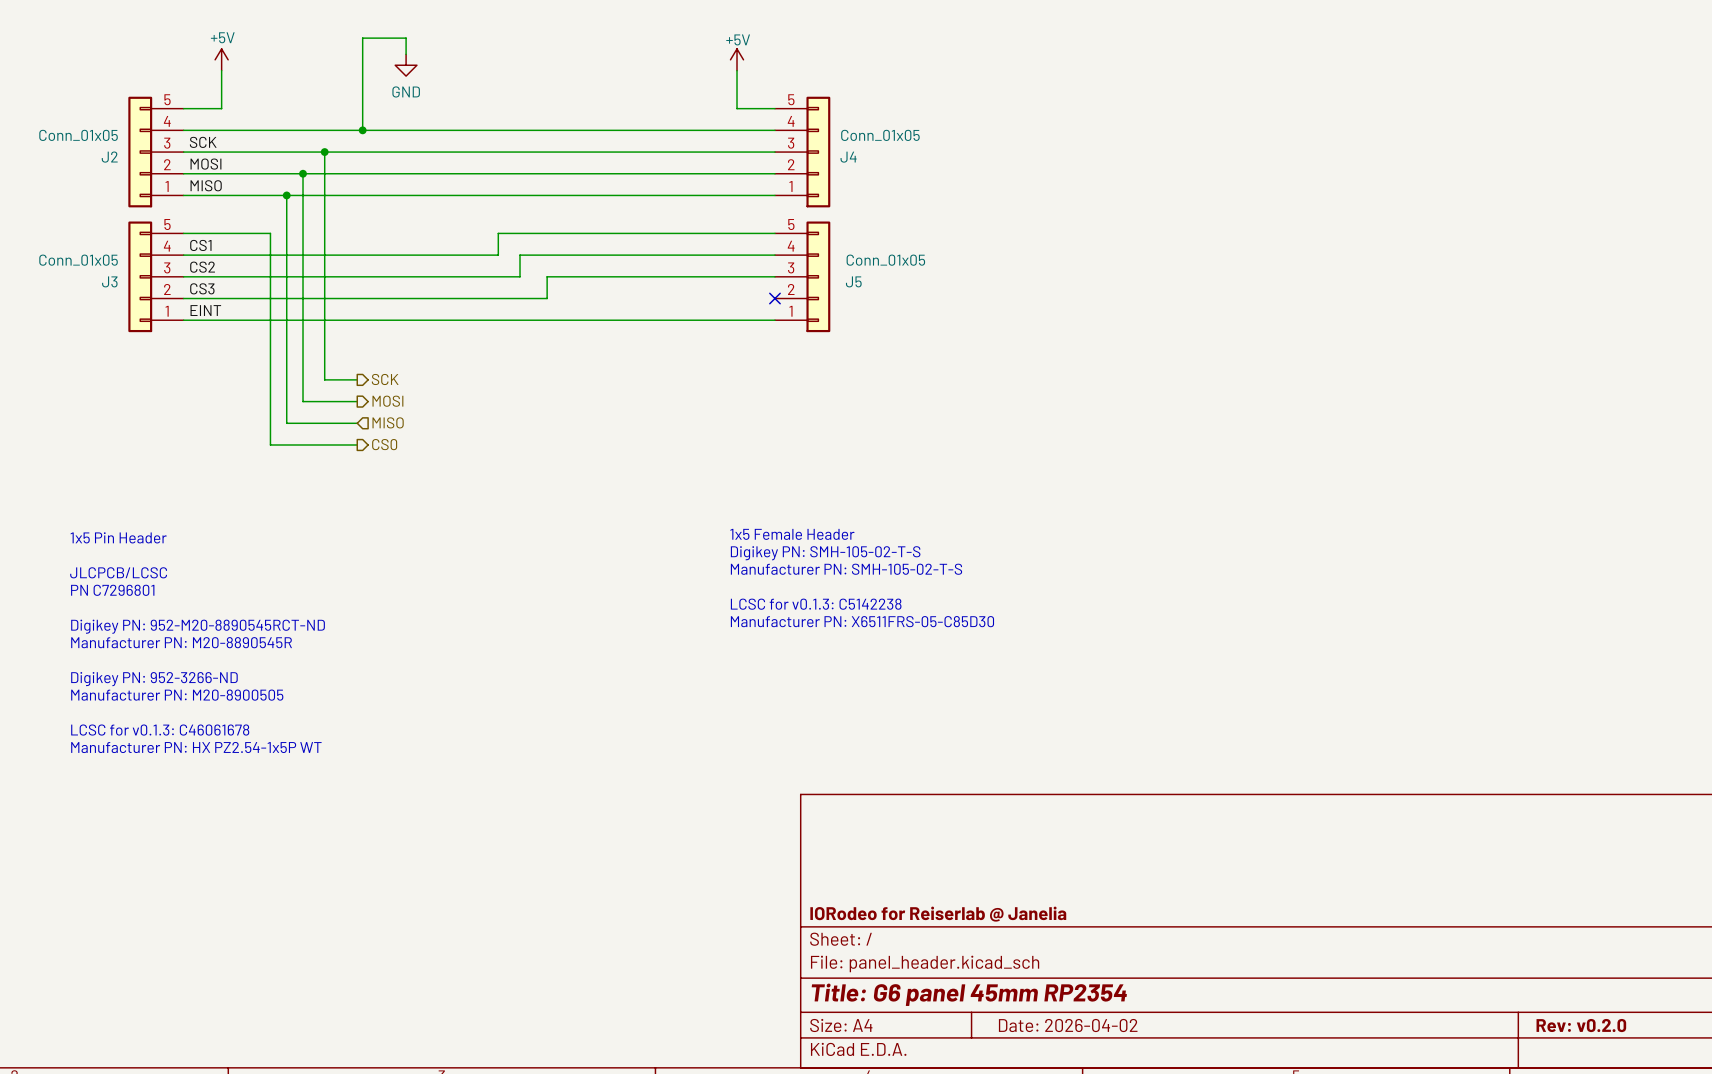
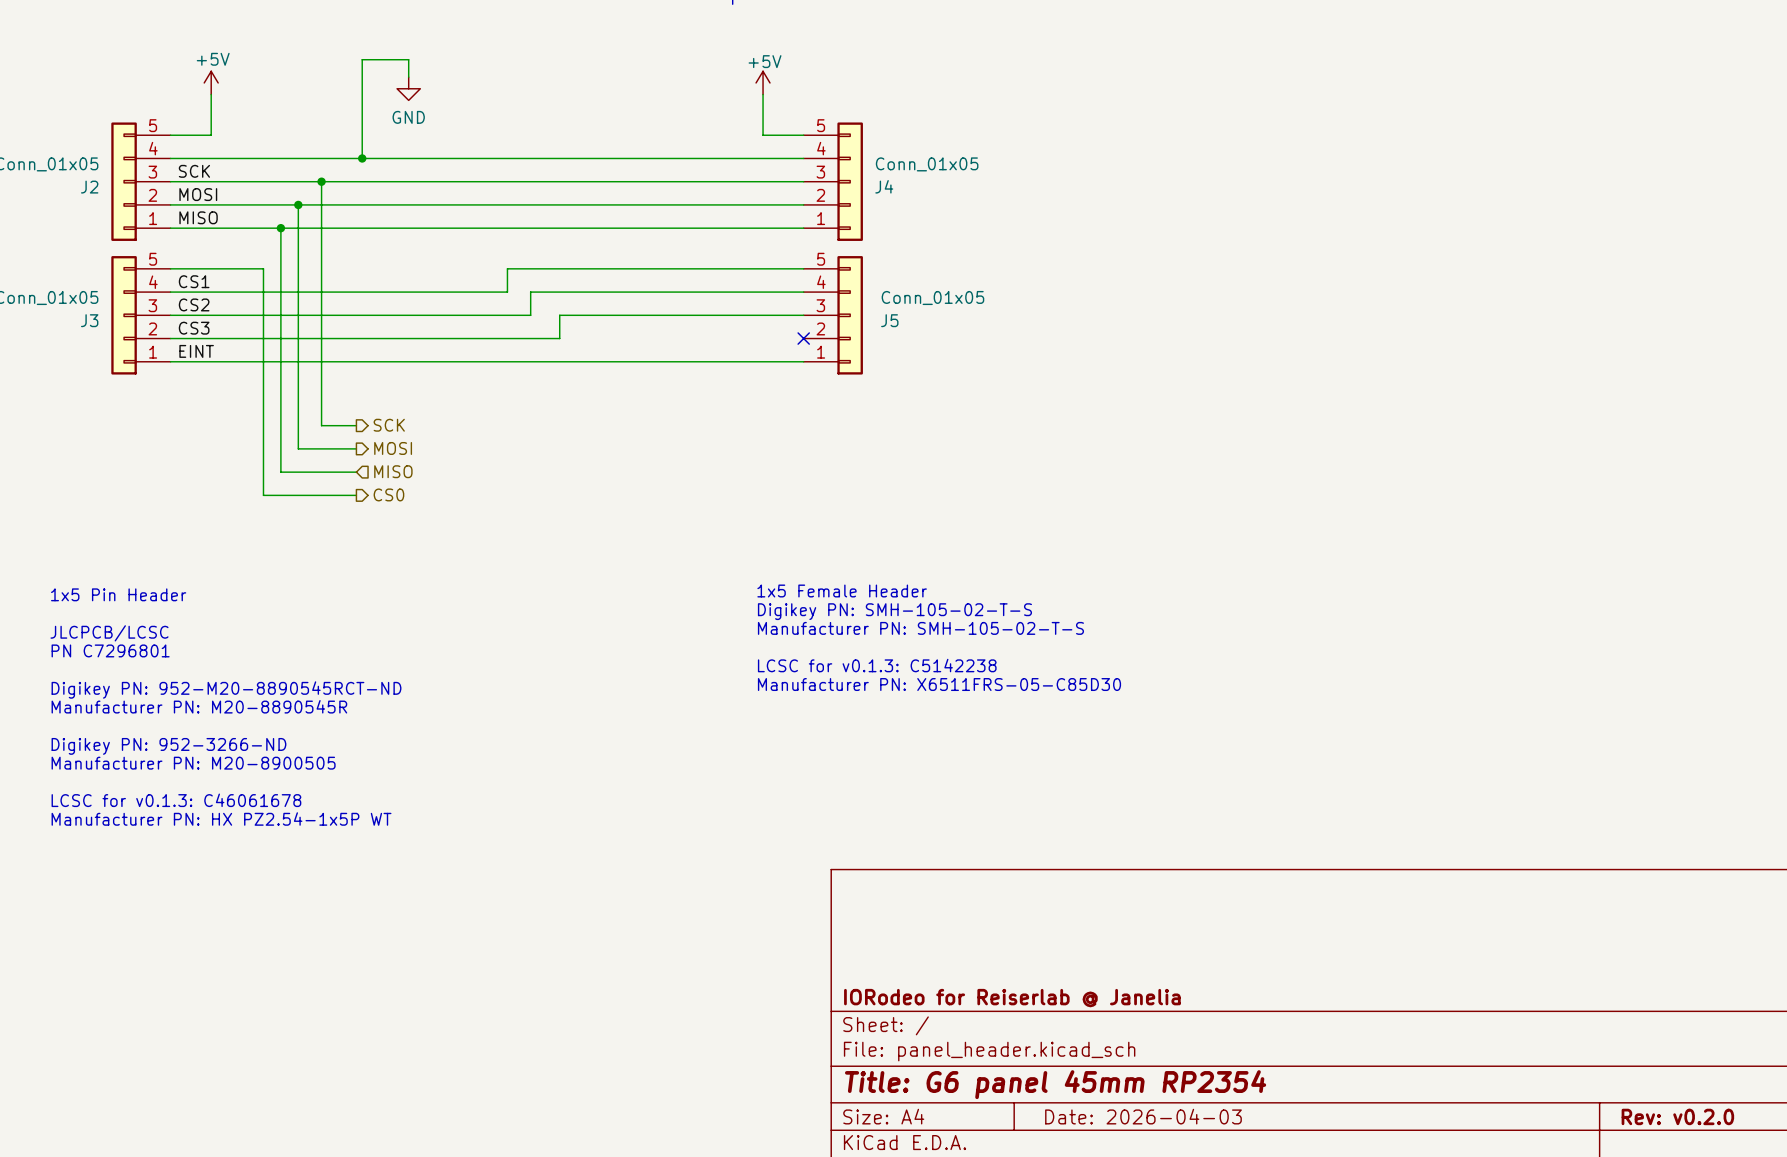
title block: Date: 2026-04-02 (1068, 1025) -> Date: 2026-04-03 (1143, 1116)

